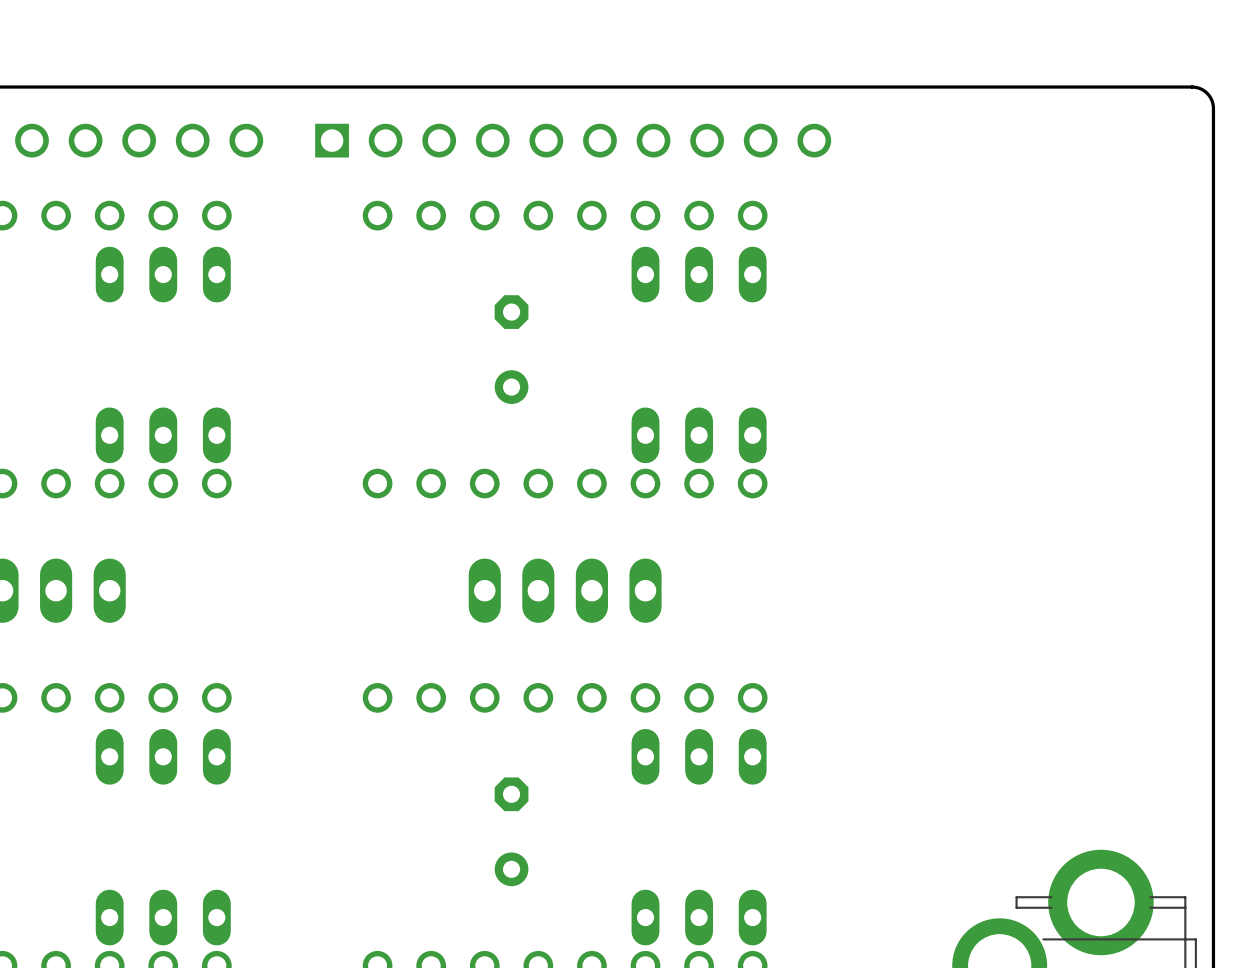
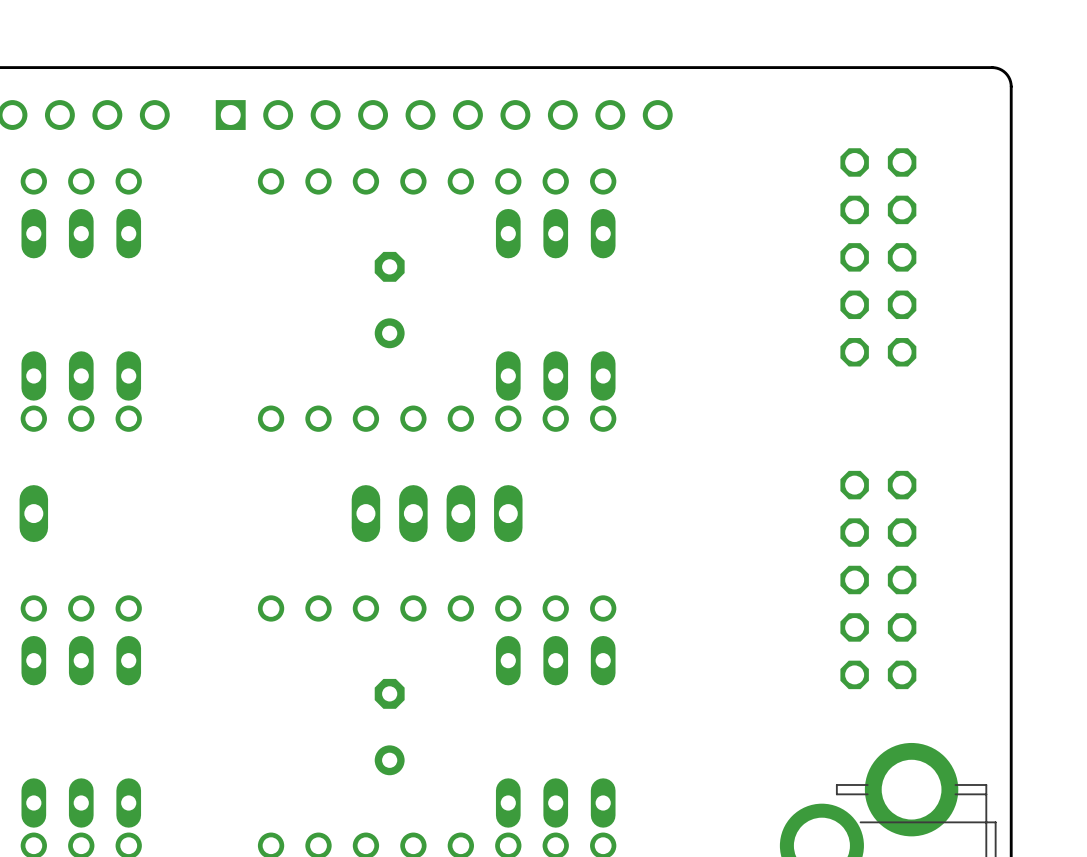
part: none -> (878, 257)
part: none -> (878, 580)

